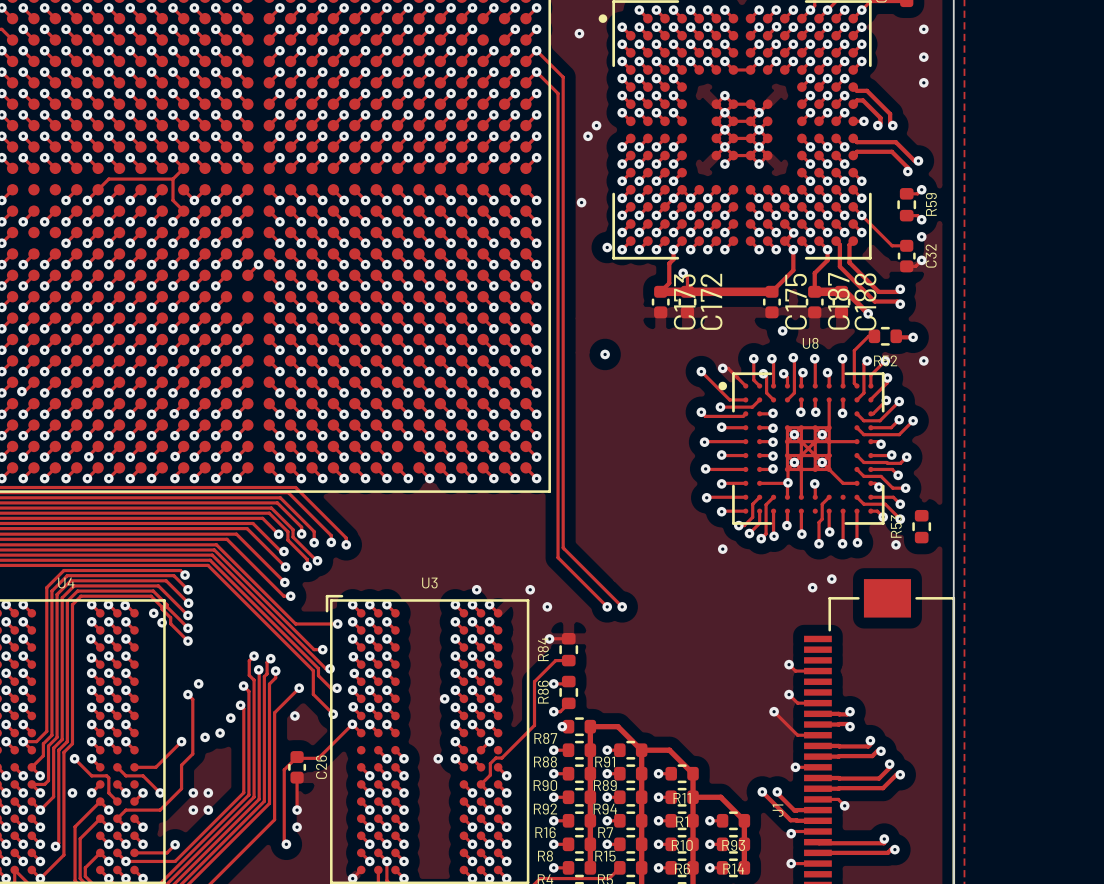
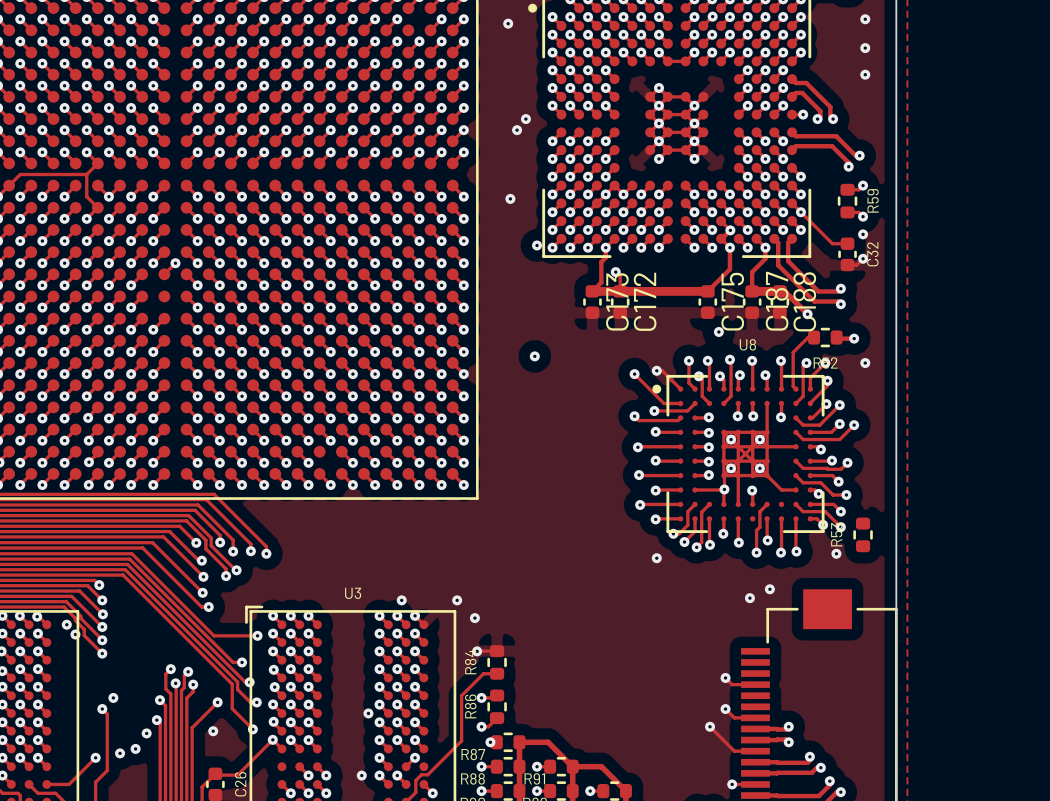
track: (536, 50) (563, 77) (563, 547) (622, 606) -> none
track: (536, 72) (558, 93) (558, 557) (607, 606) -> none
via: (607, 606) -> none
via: (622, 606) -> none

